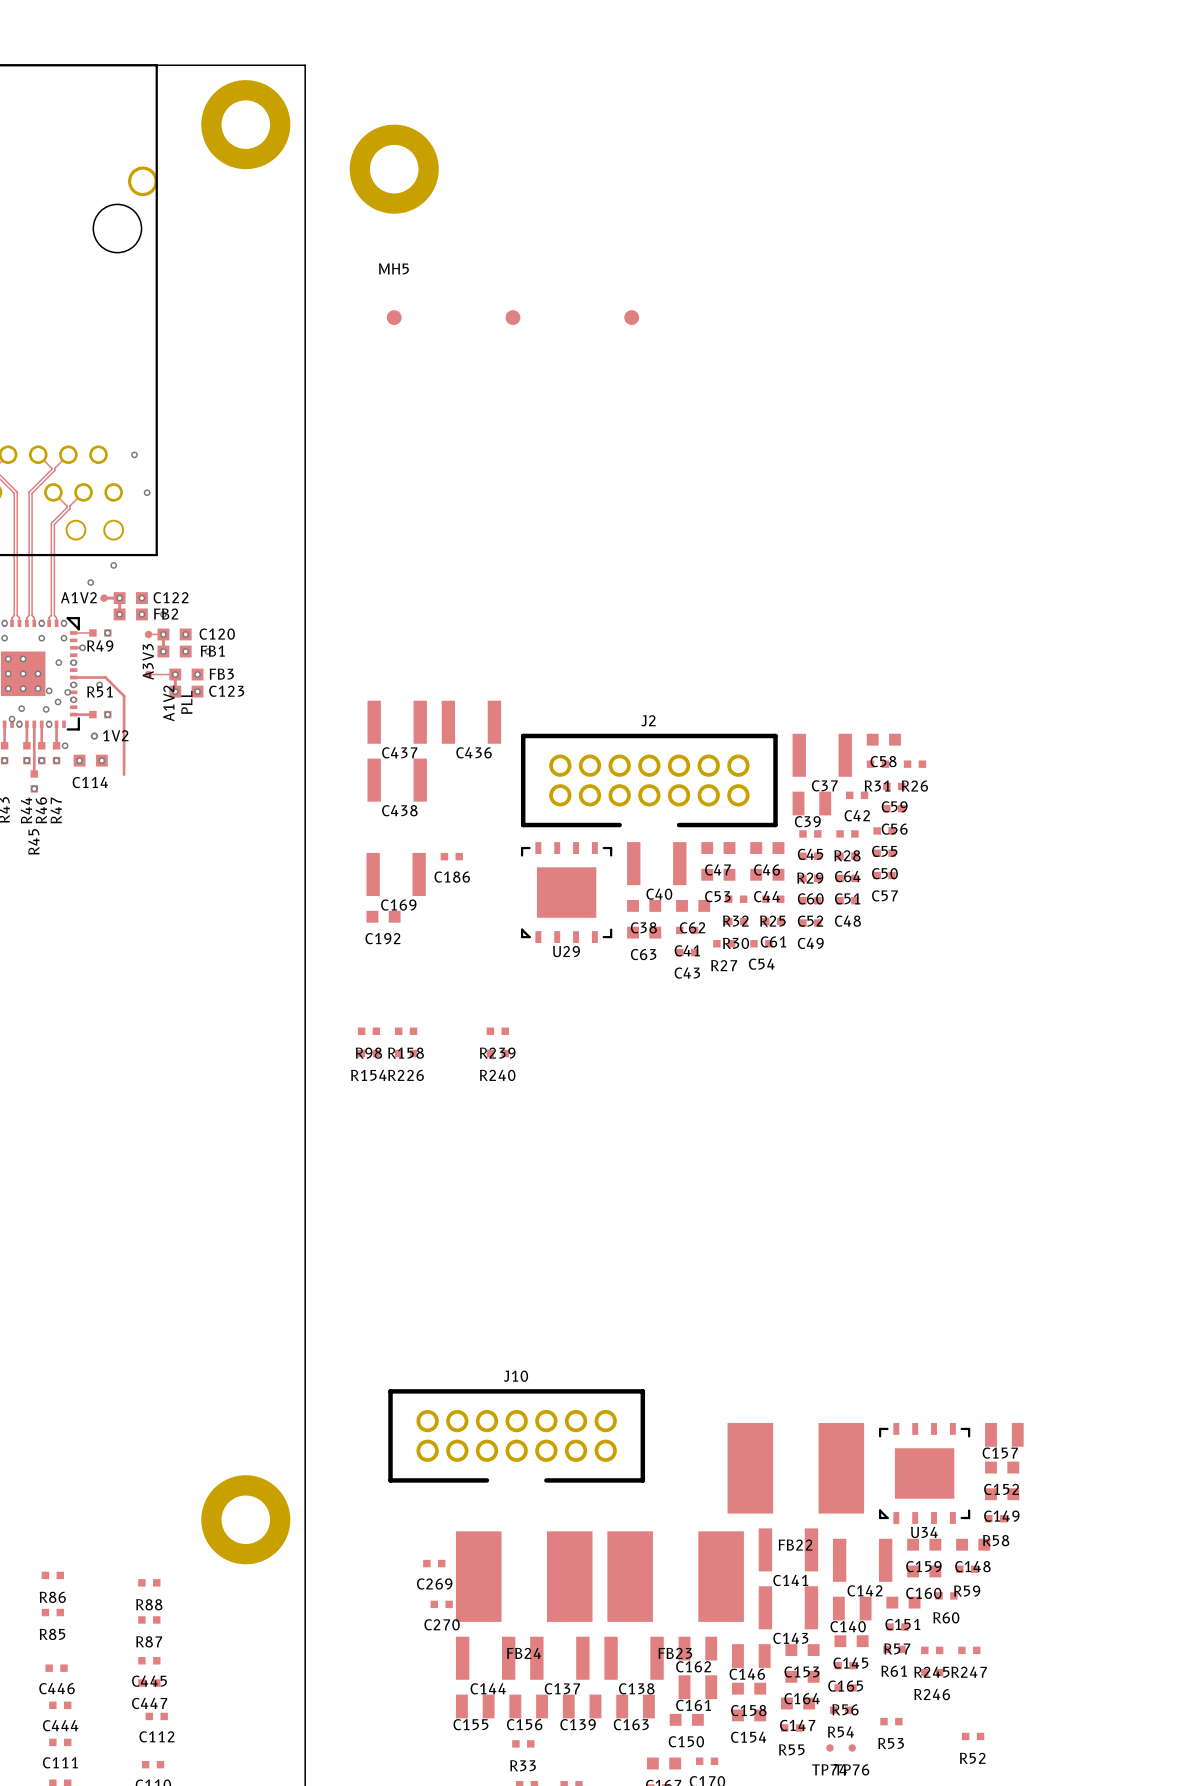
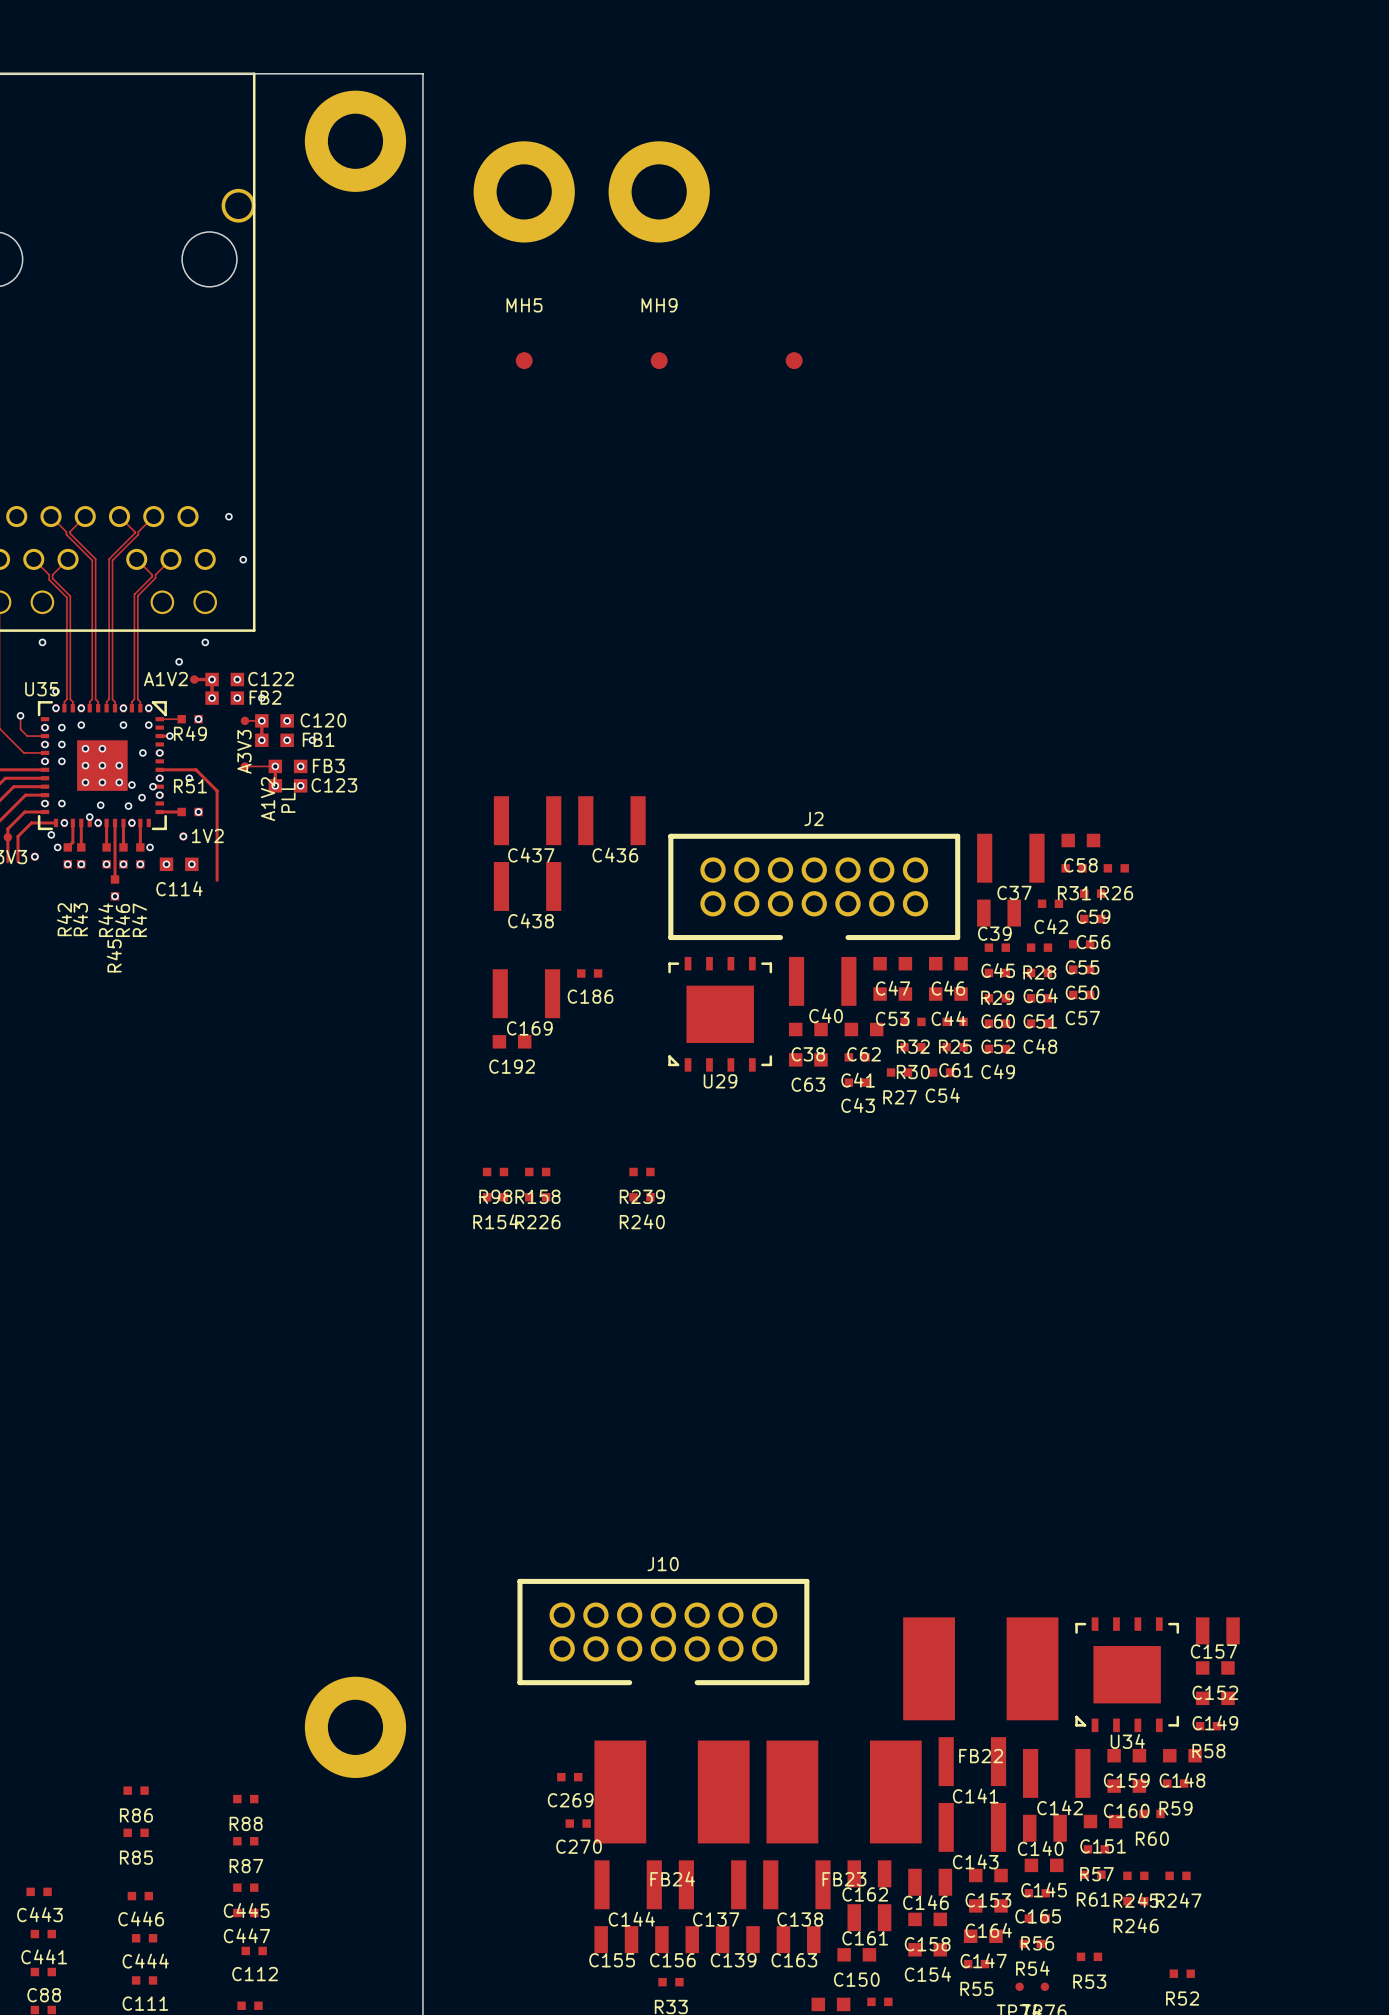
MH9: none -> (659, 191)

